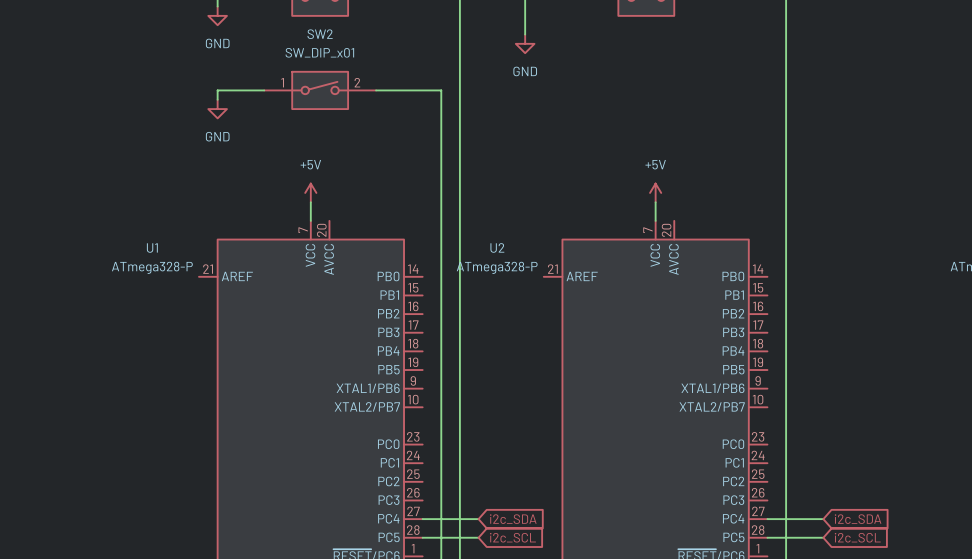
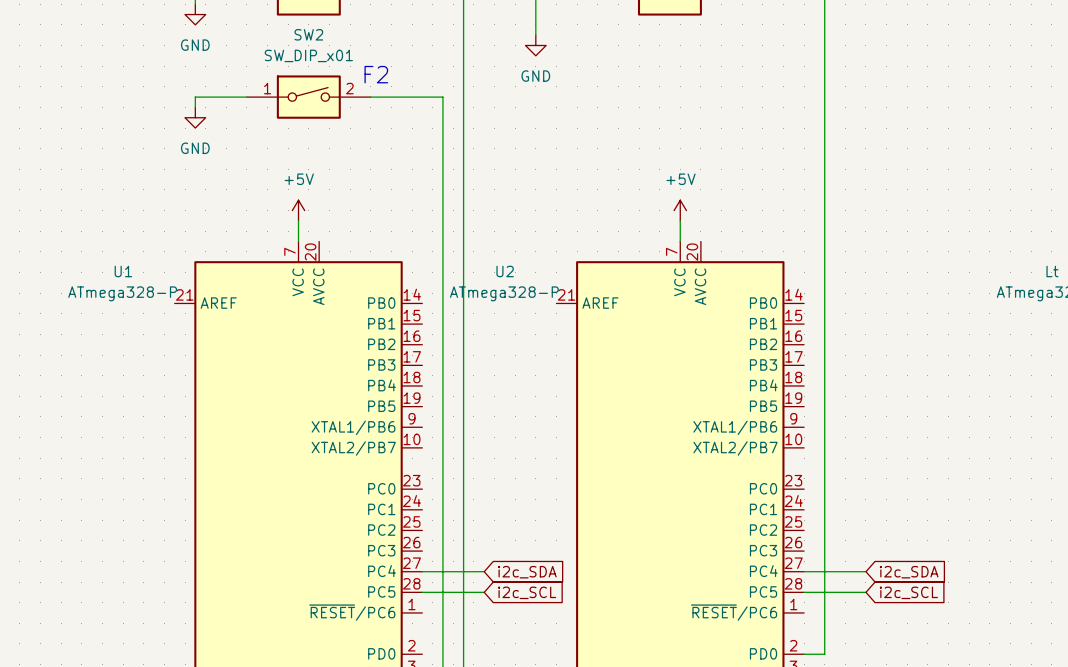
text: none -> F2 (376, 74)

